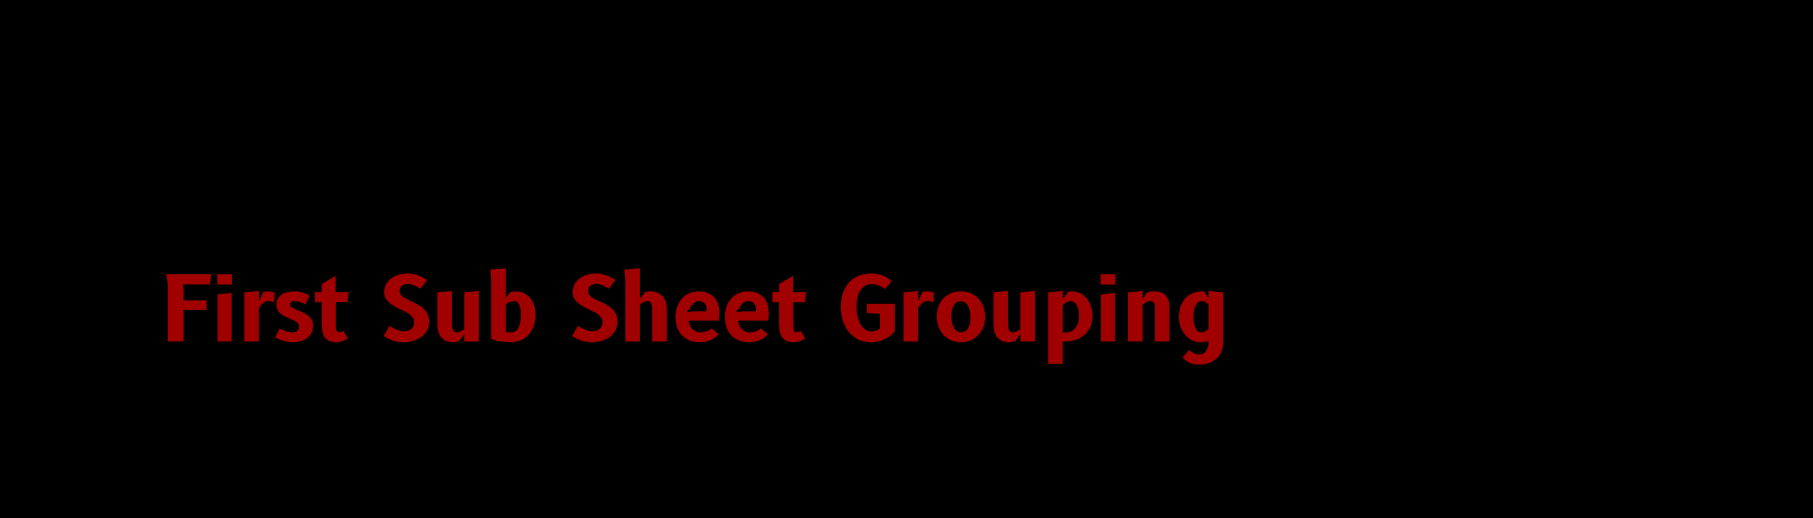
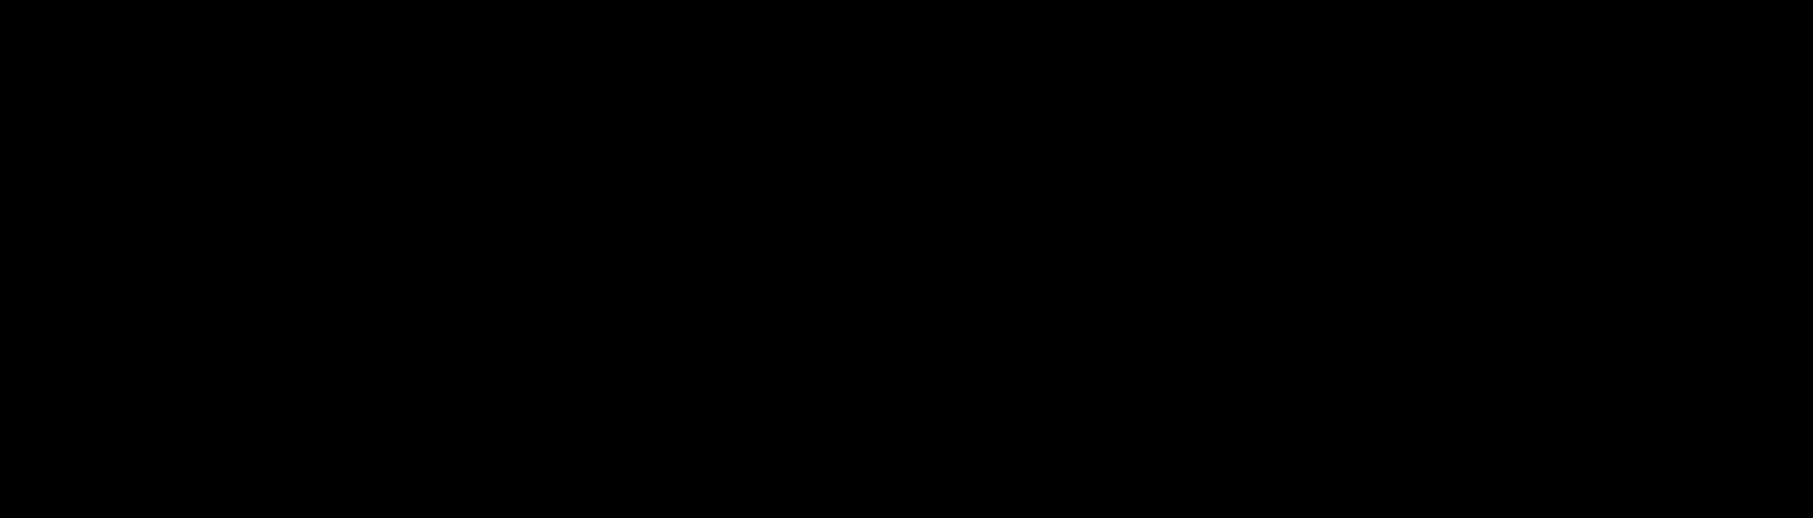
text: First Sub Sheet Grouping (694, 316) -> none

